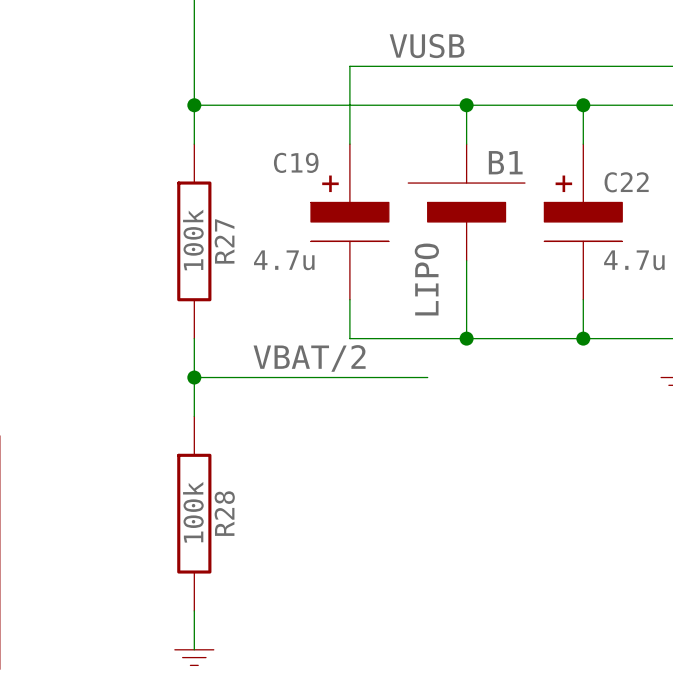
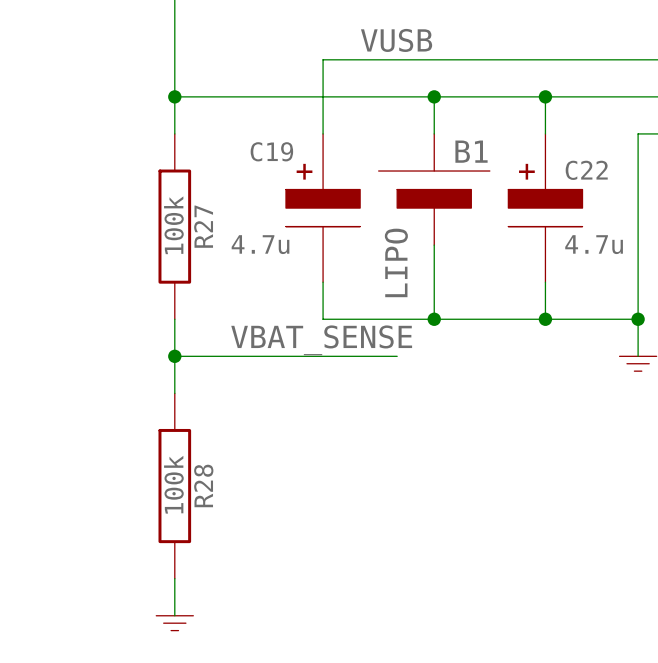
label: VBAT/2 (309, 358) -> VBAT_SENSE (321, 340)

